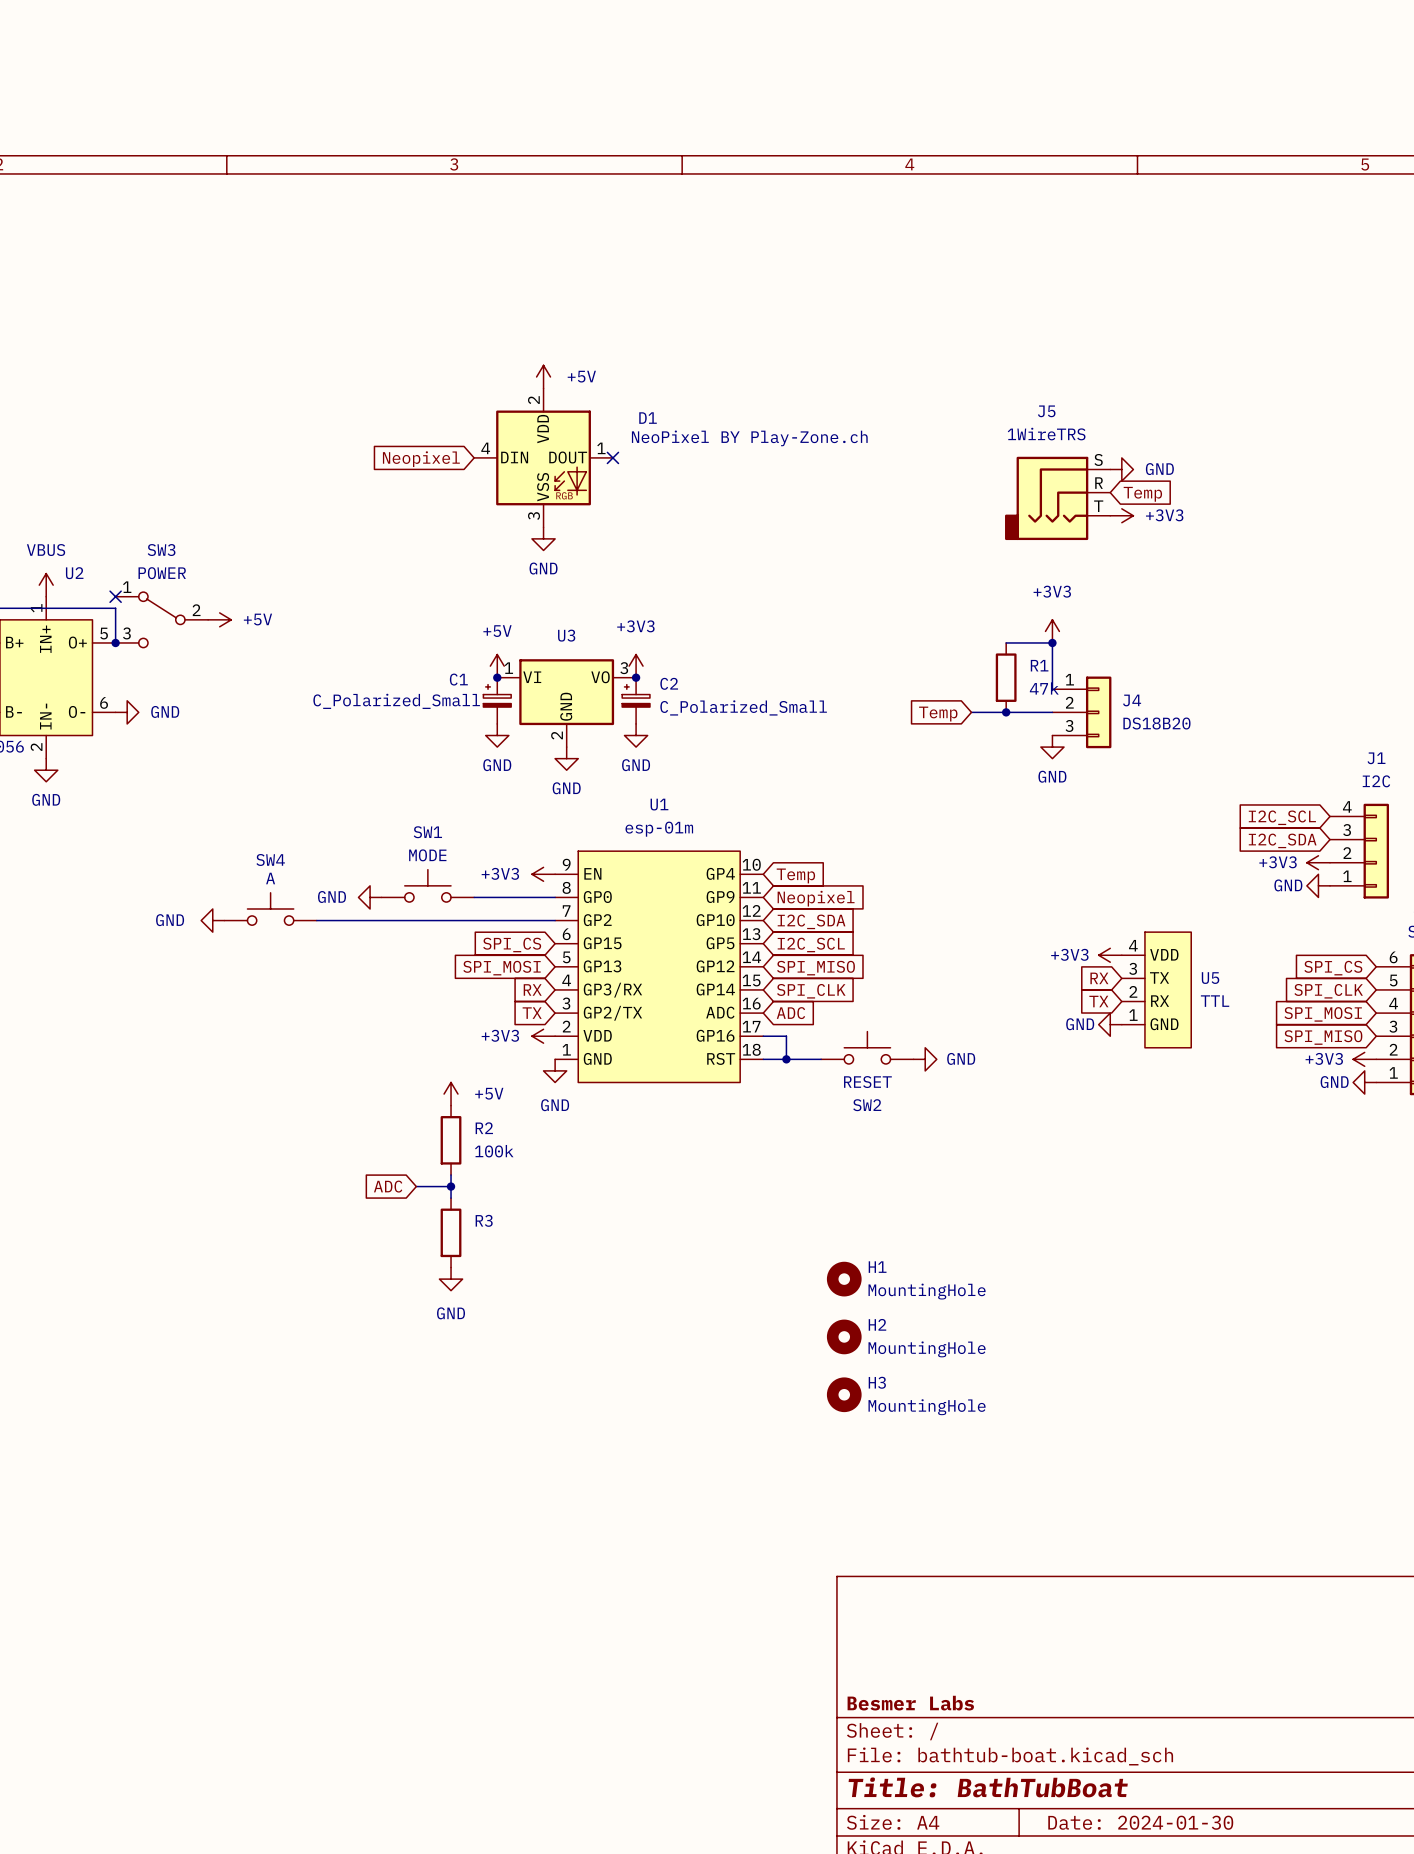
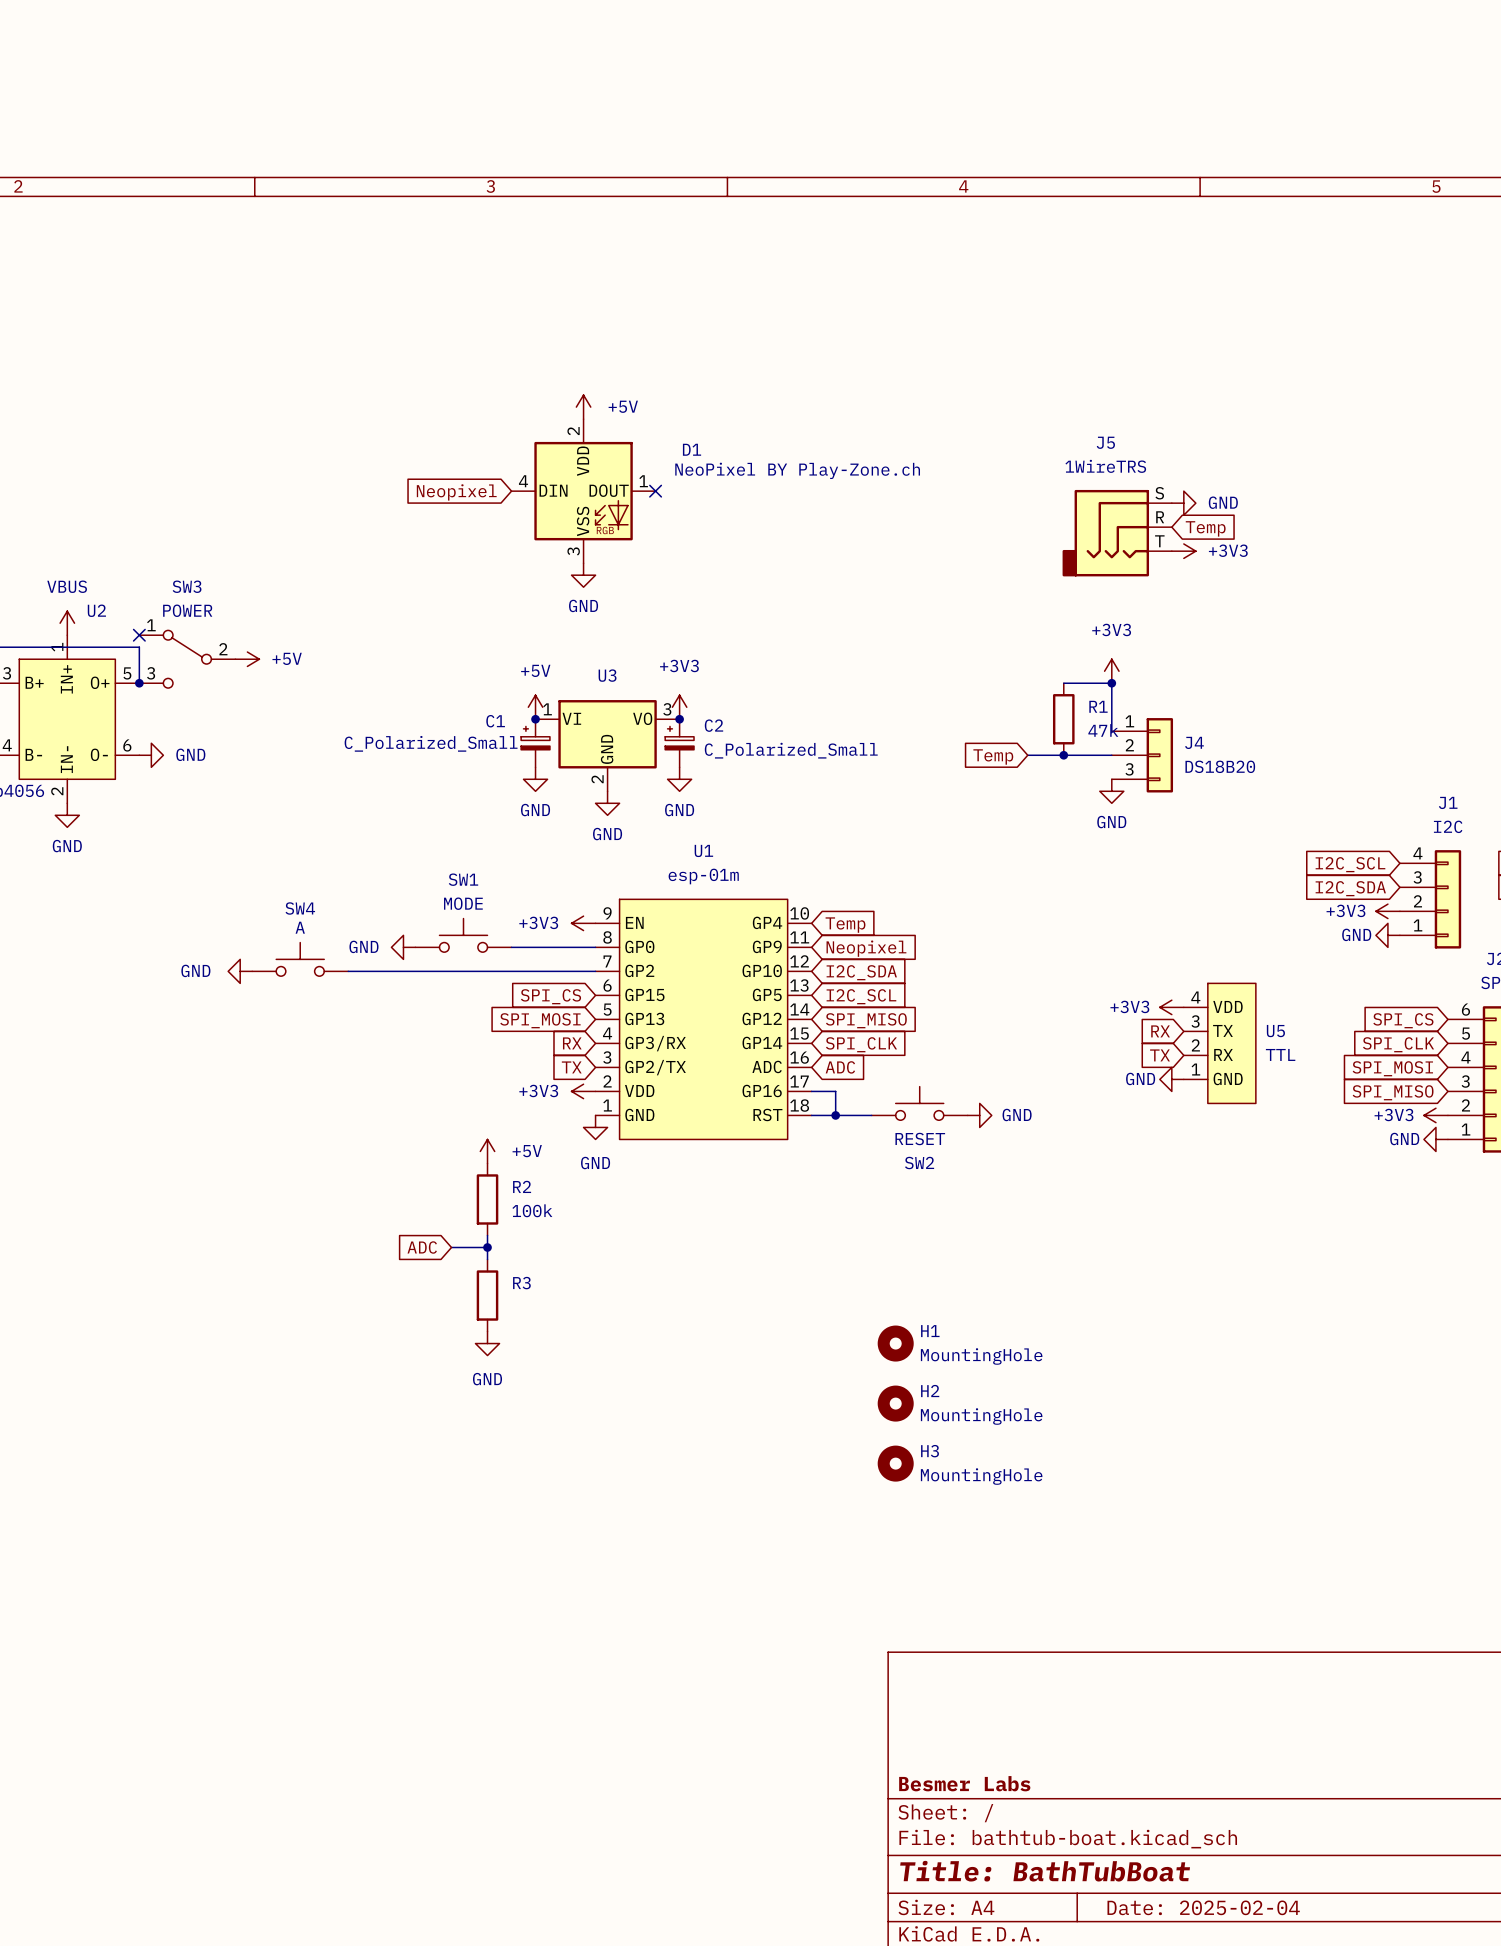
title block: Date: 2024-01-30 (1140, 1822) -> Date: 2025-02-04 (1203, 1907)

